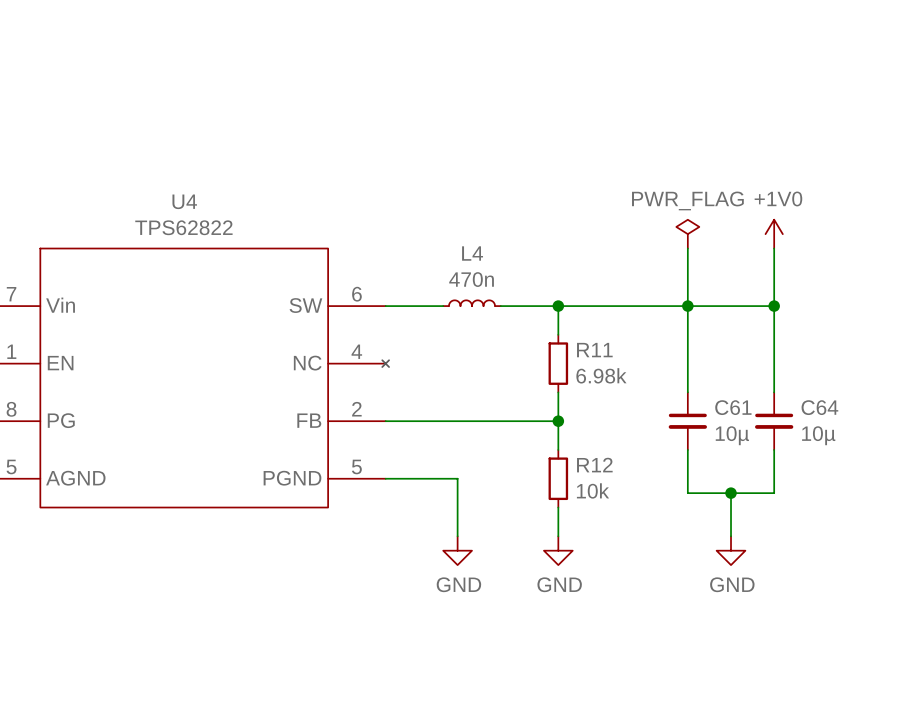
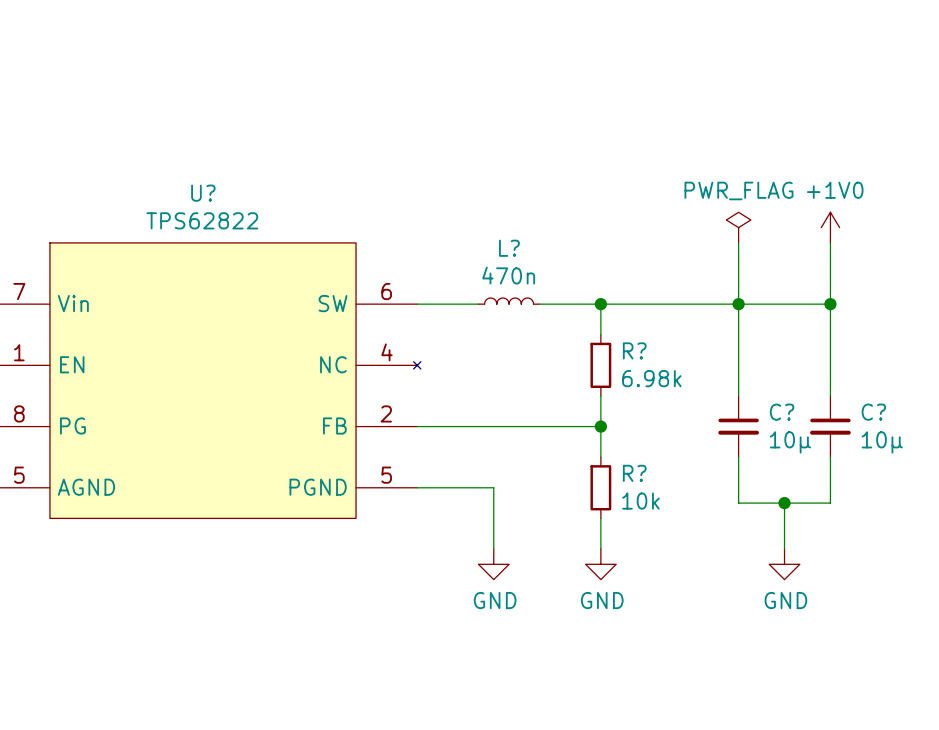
U4 name: U4 (184, 201) -> U? (203, 193)
L4 name: L4 (472, 253) -> L? (509, 248)
R11 name: R11 (594, 350) -> R? (634, 350)
C61 name: C61 (733, 407) -> C? (782, 412)
C64 name: C64 (819, 407) -> C? (873, 412)
R12 name: R12 (594, 465) -> R? (634, 473)

